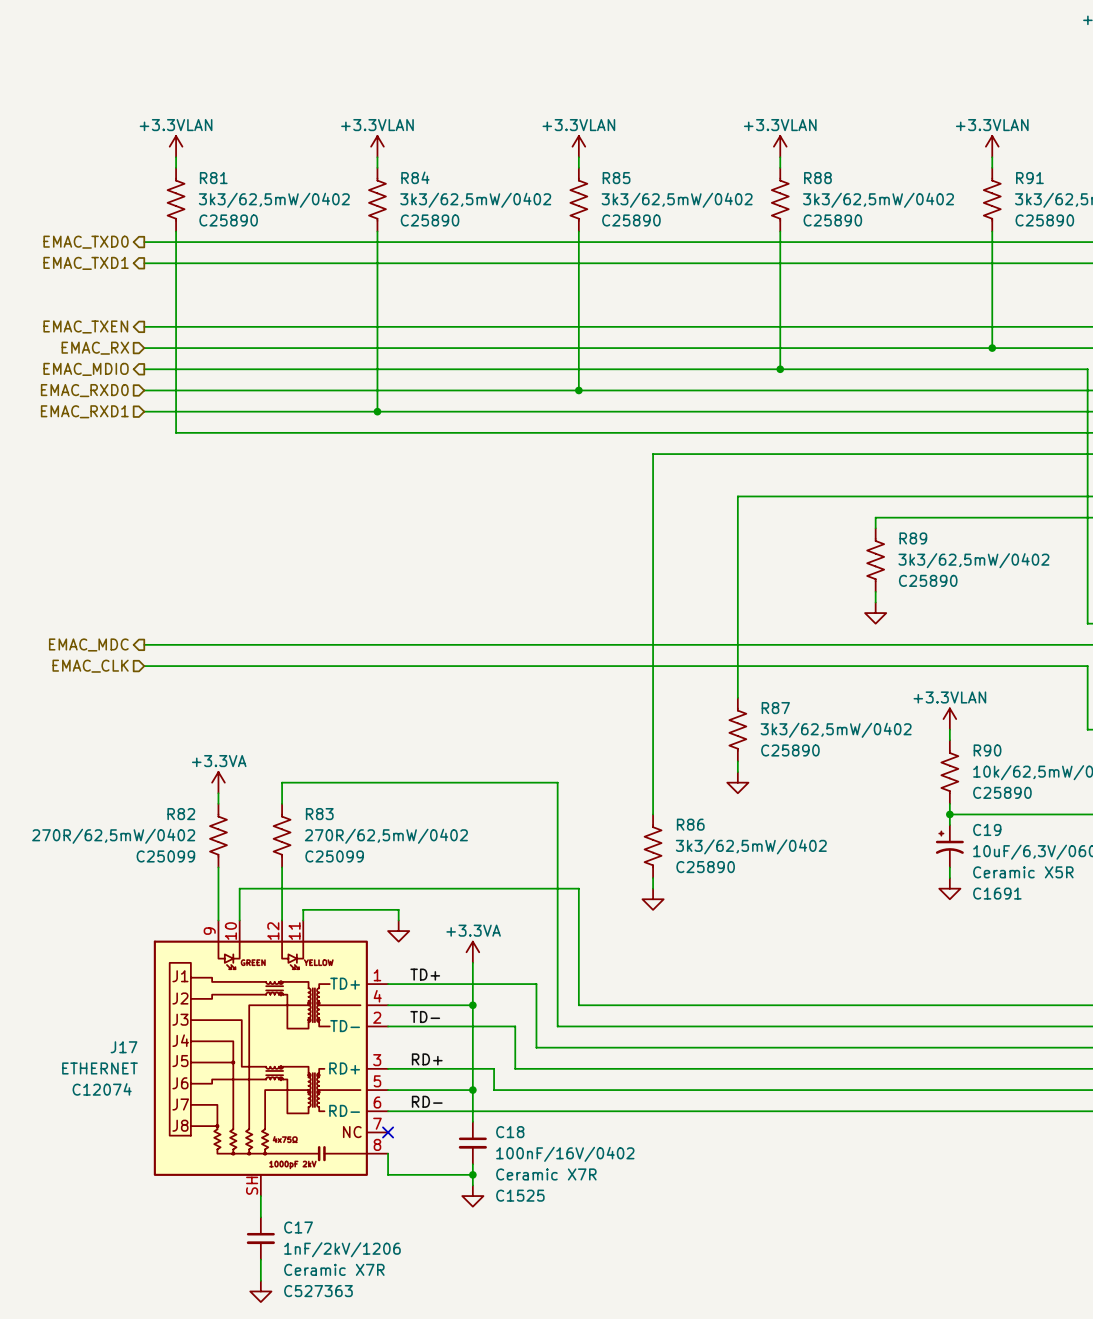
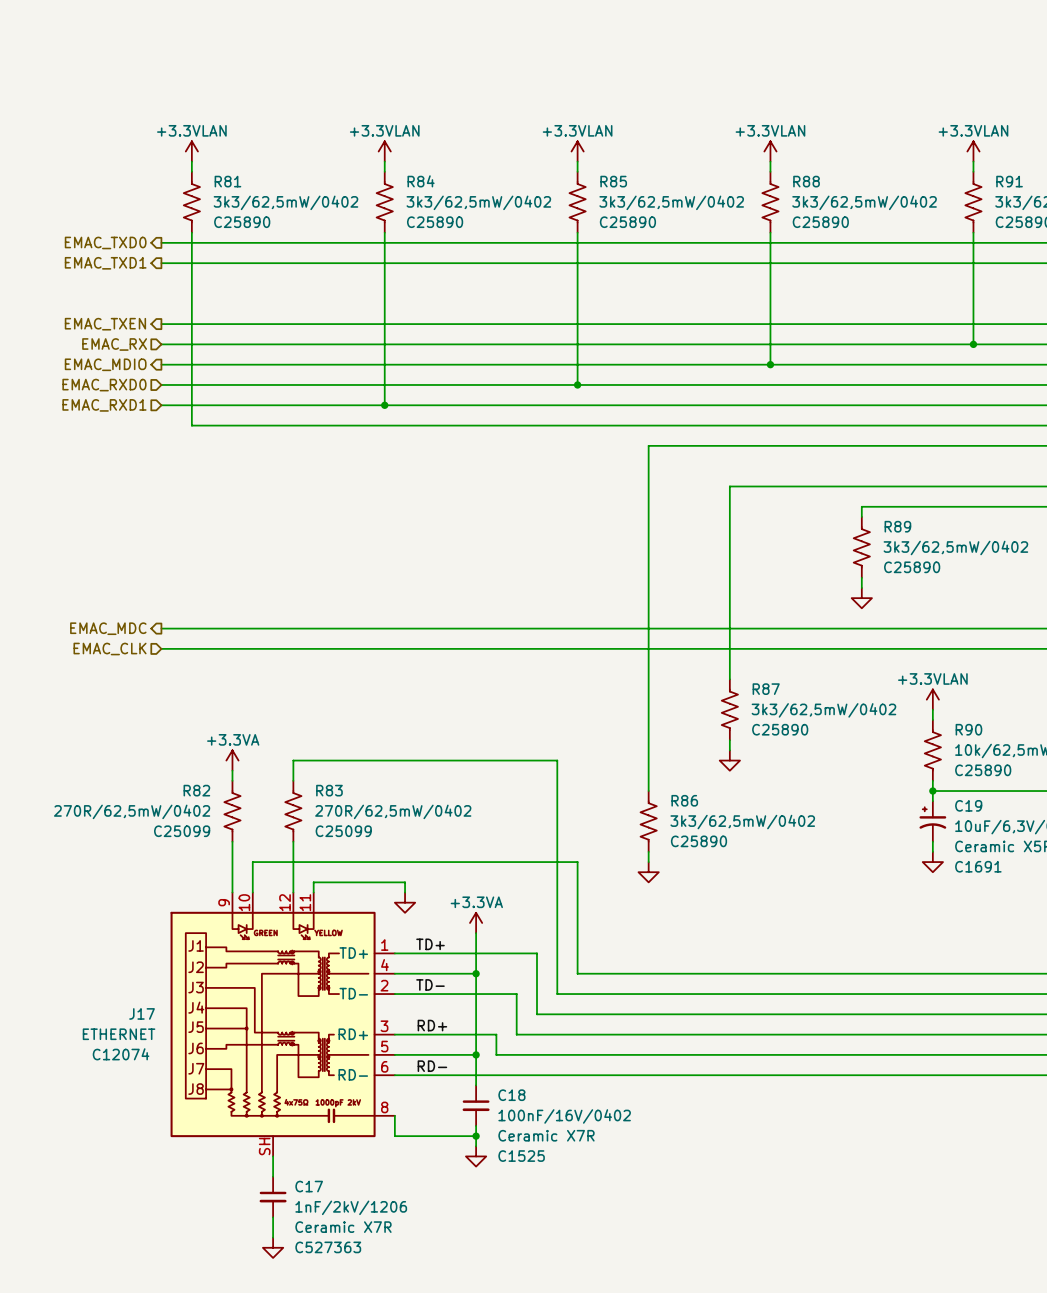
J17 symbol: [153, 920, 389, 1197] -> [170, 892, 395, 1157]
no-connect mark: (388, 1132) -> none

